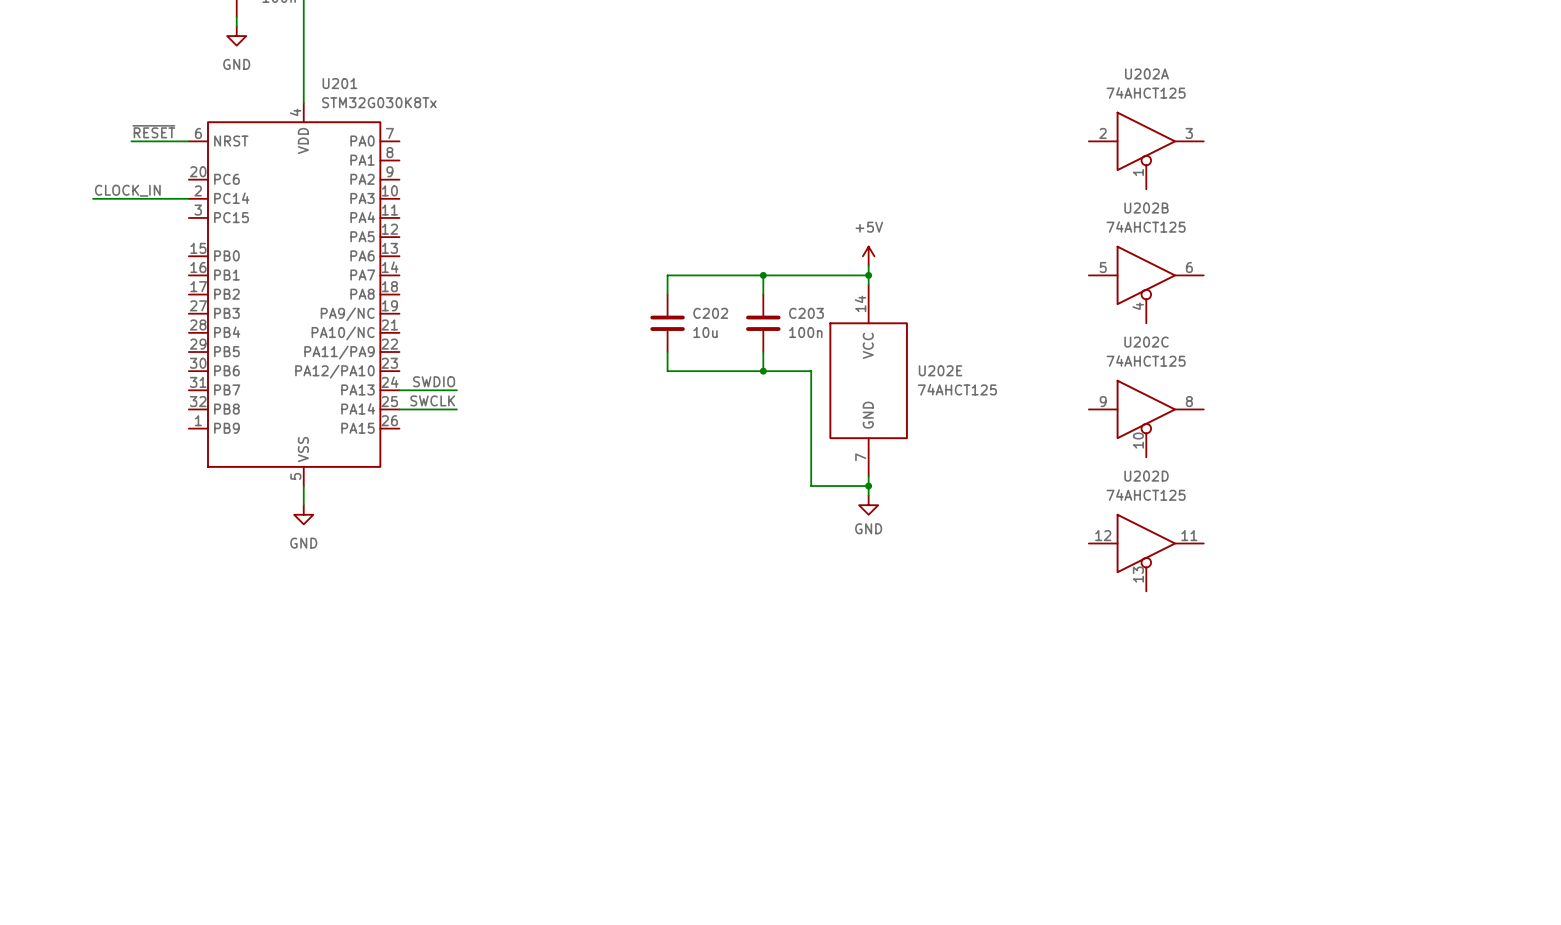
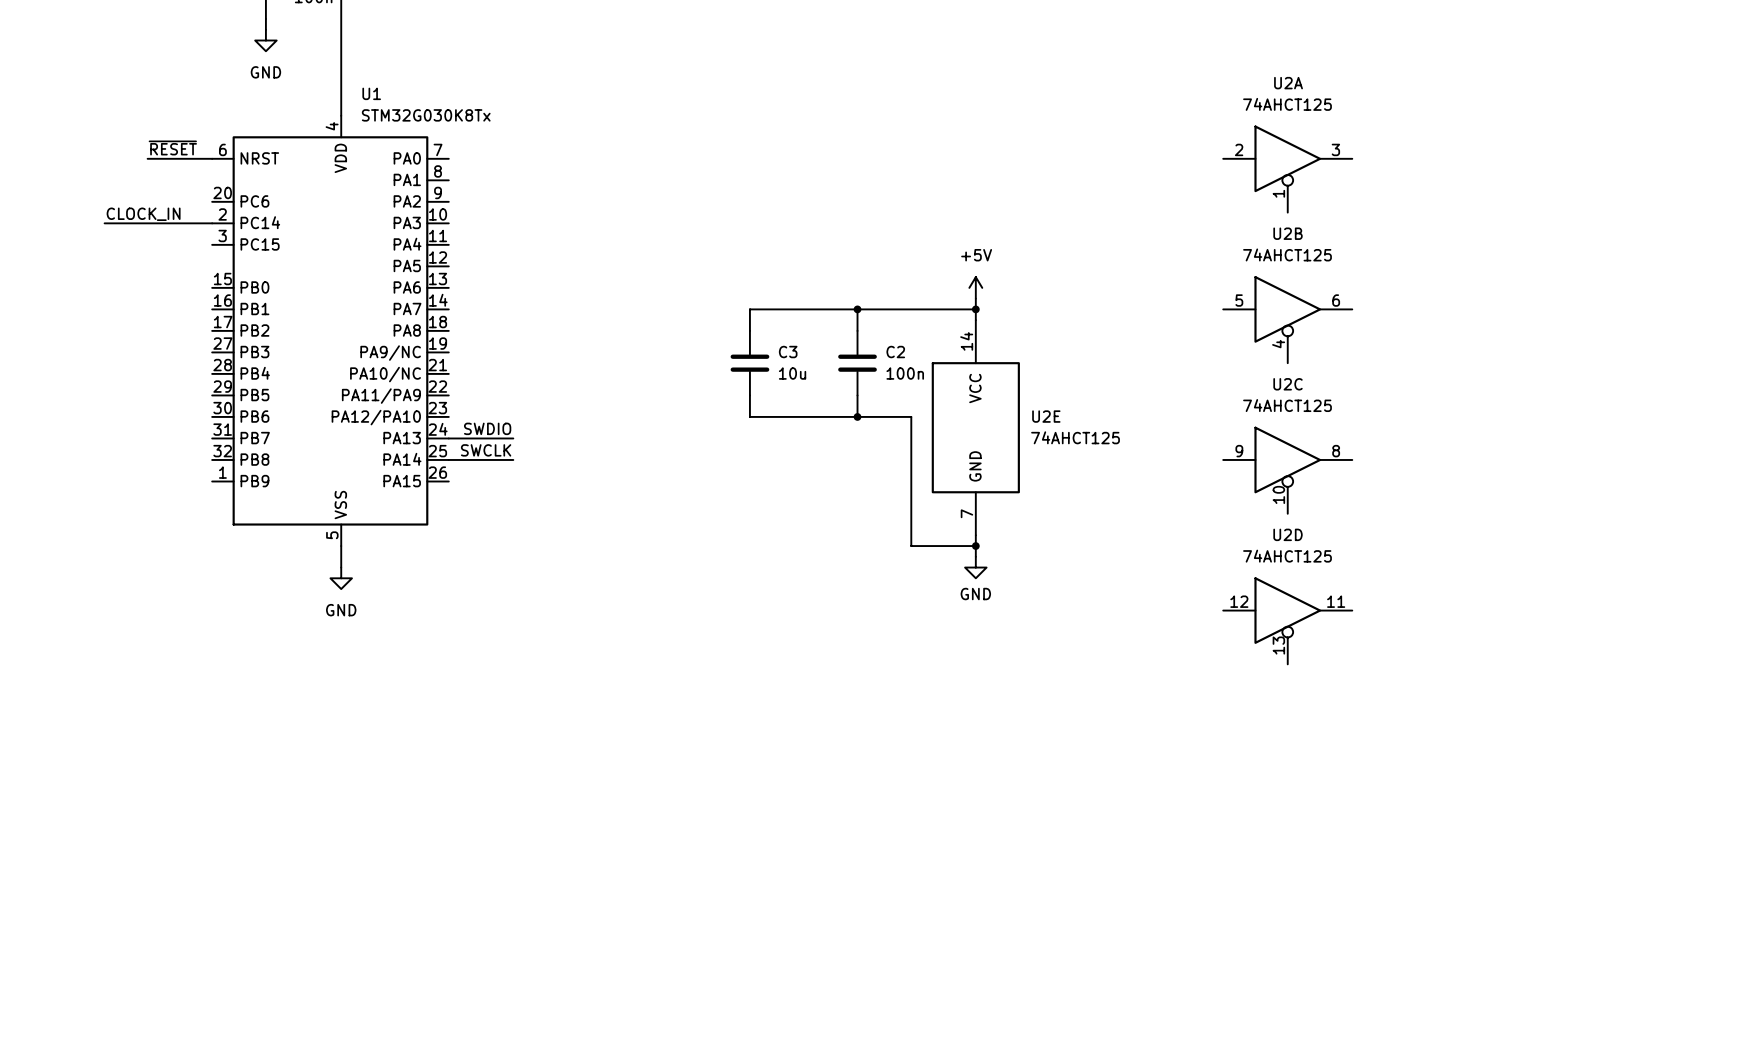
U202A name: U202A (1146, 73) -> U2A (1288, 83)
U201 name: U201 (339, 83) -> U1 (371, 93)
U202B name: U202B (1146, 208) -> U2B (1288, 233)
C202 name: C202 (710, 313) -> C3 (788, 352)
C203 name: C203 (806, 313) -> C2 (895, 352)
U202C name: U202C (1146, 342) -> U2C (1288, 384)
U202E name: U202E (940, 370) -> U2E (1046, 416)
U202D name: U202D (1146, 476) -> U2D (1288, 534)

